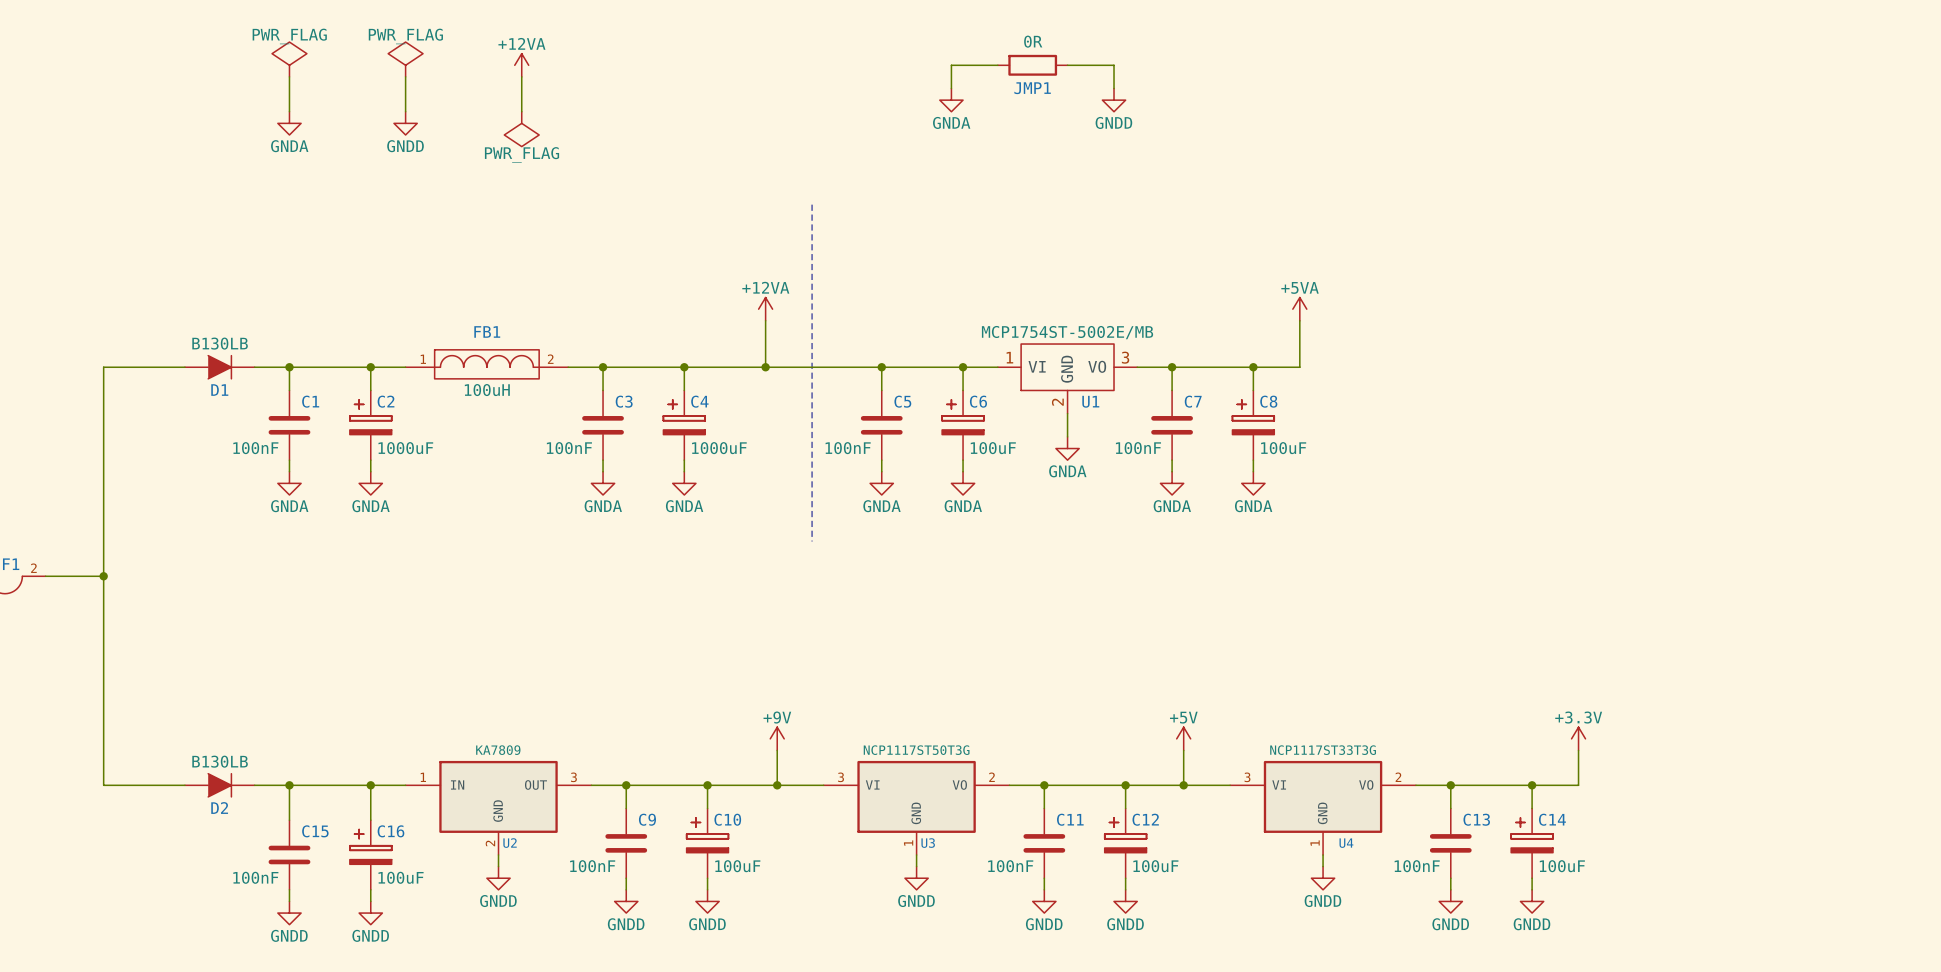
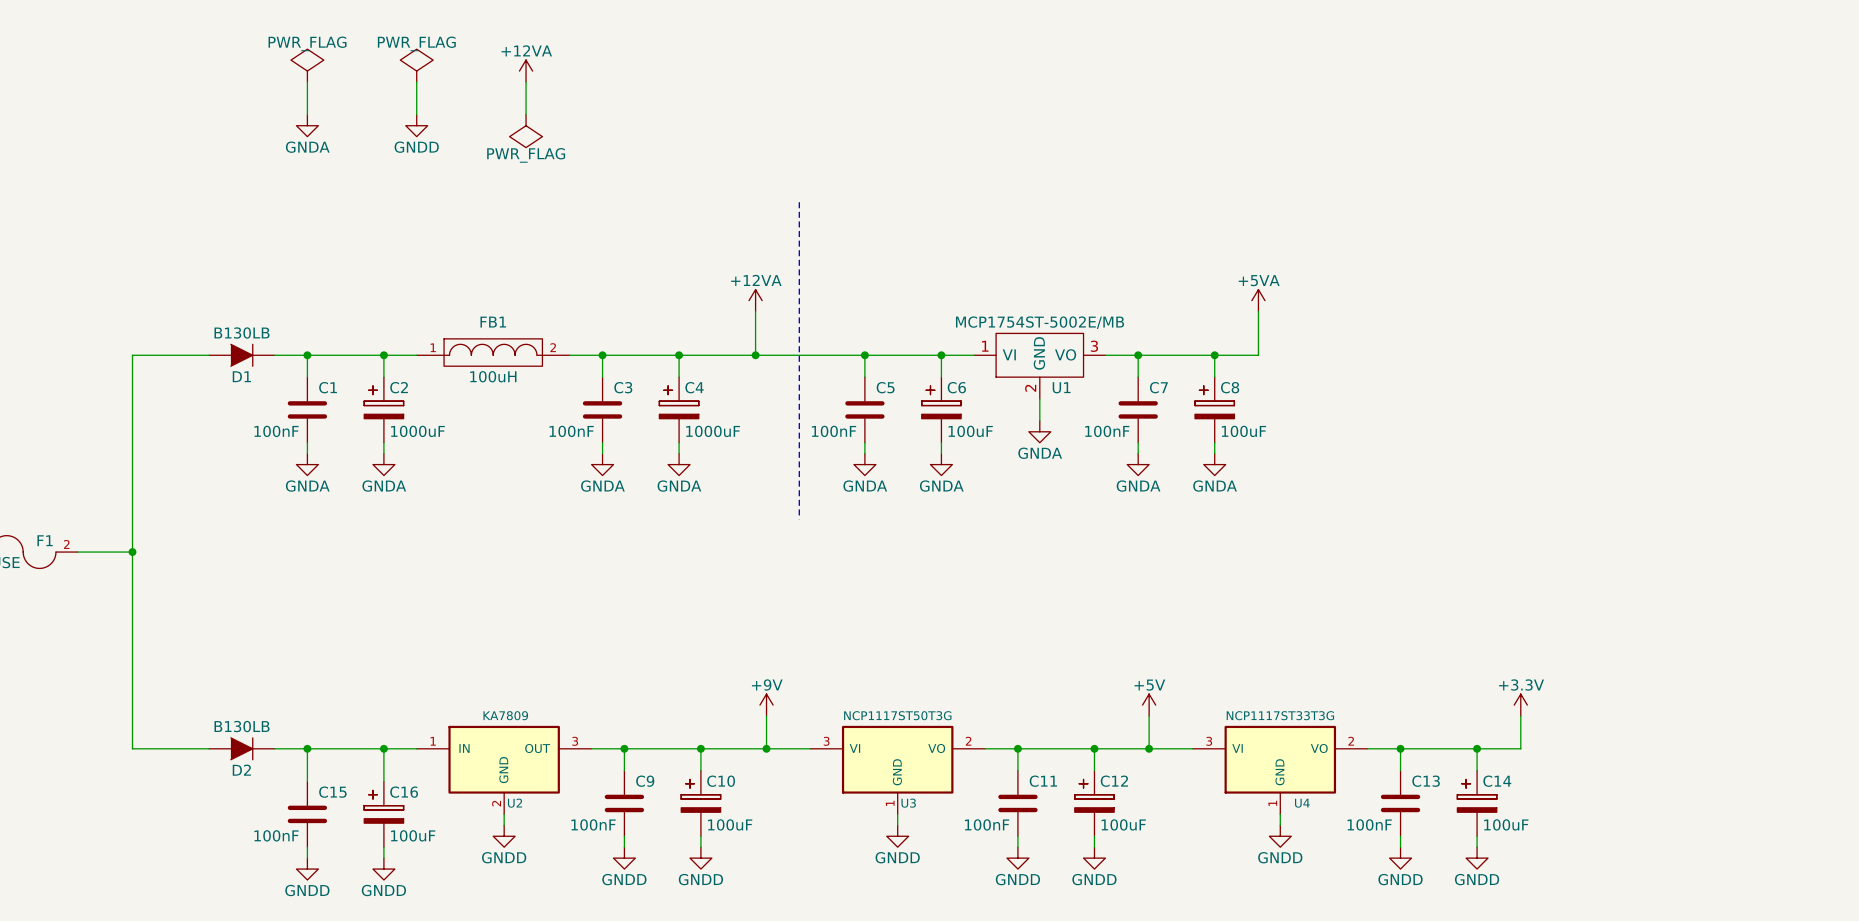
wire: (997, 65) (951, 65) (951, 88) -> none
JMP1: 0R (1032, 65) -> none
wire: (1067, 65) (1114, 65) (1114, 88) -> none
power symbol: GNDA (951, 100) -> none
power symbol: GNDD (1114, 100) -> none

